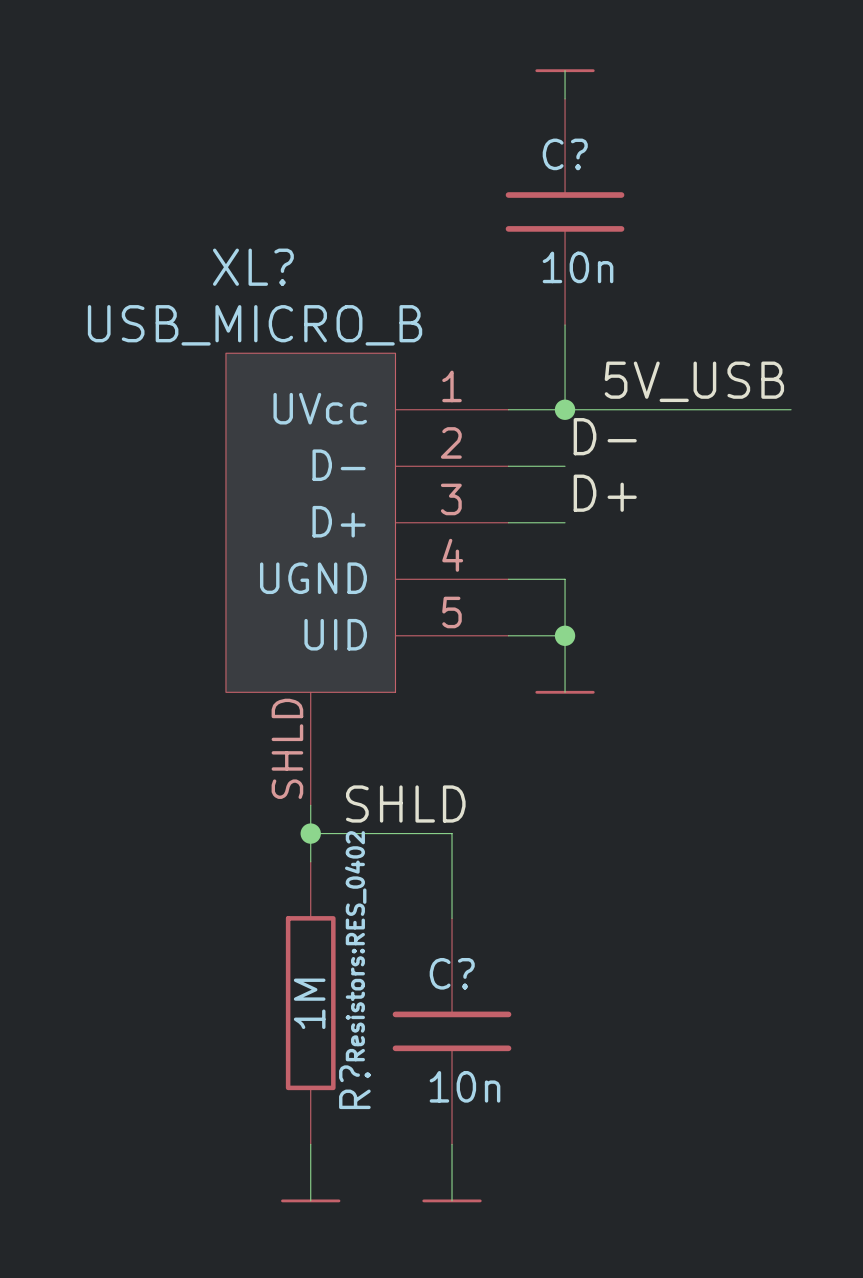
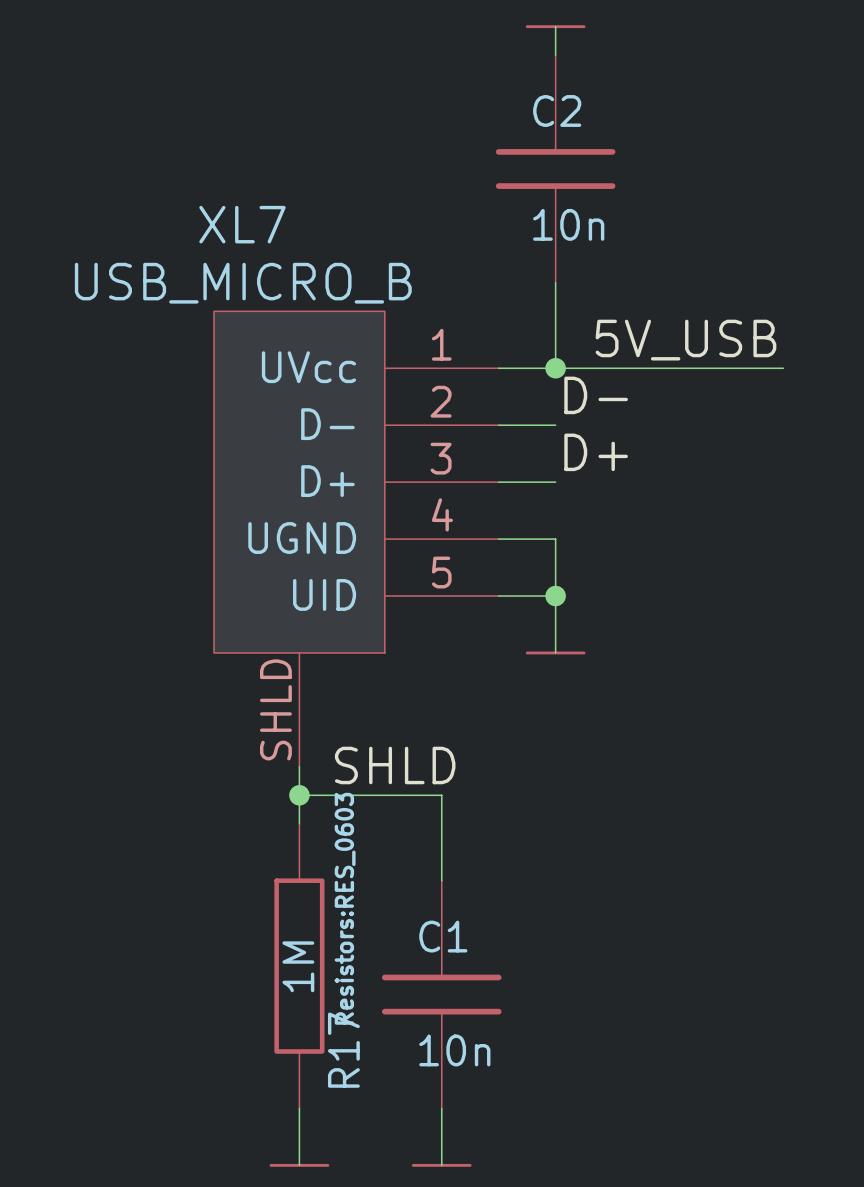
C? name: C? (565, 154) -> C2 (557, 110)
XL? name: XL? (253, 267) -> XL7 (242, 224)
R? text: Resistors:RES_0402 (355, 946) -> Resistors:RES_0603 (345, 908)
C? name: C? (452, 973) -> C1 (443, 936)
R? name: R? (354, 1087) -> R17 (343, 1050)

